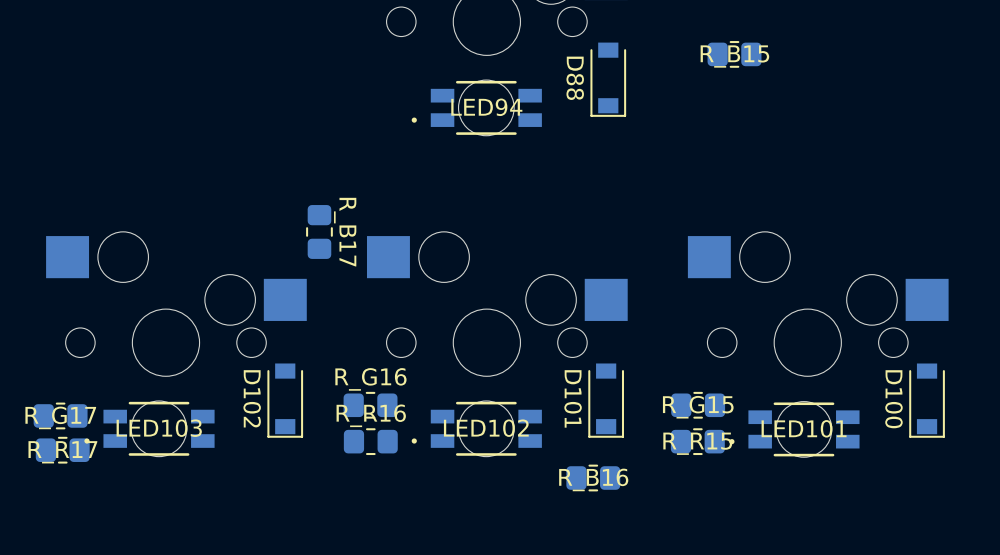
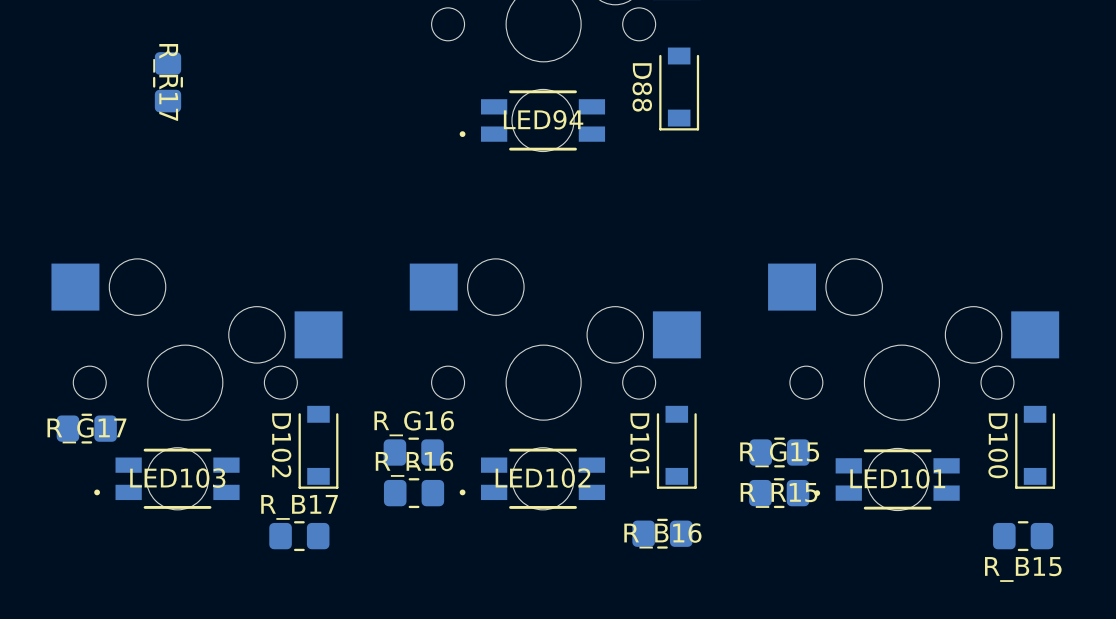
R_B15 position: (734, 54) -> (1023, 536)
R_B15 name position: R_B15 (734, 56) -> R_B15 (1023, 569)
R_B17 rotation: 0° (319, 231) -> 90° clockwise (299, 536)
R_B17 position: (319, 231) -> (299, 536)
R_B17 name position: R_B17 (345, 232) -> R_B17 (299, 507)
R_G17 position: (60, 415) -> (86, 428)
R_R17 rotation: 0° (62, 450) -> 90° clockwise (167, 82)
R_R17 position: (62, 450) -> (167, 82)

